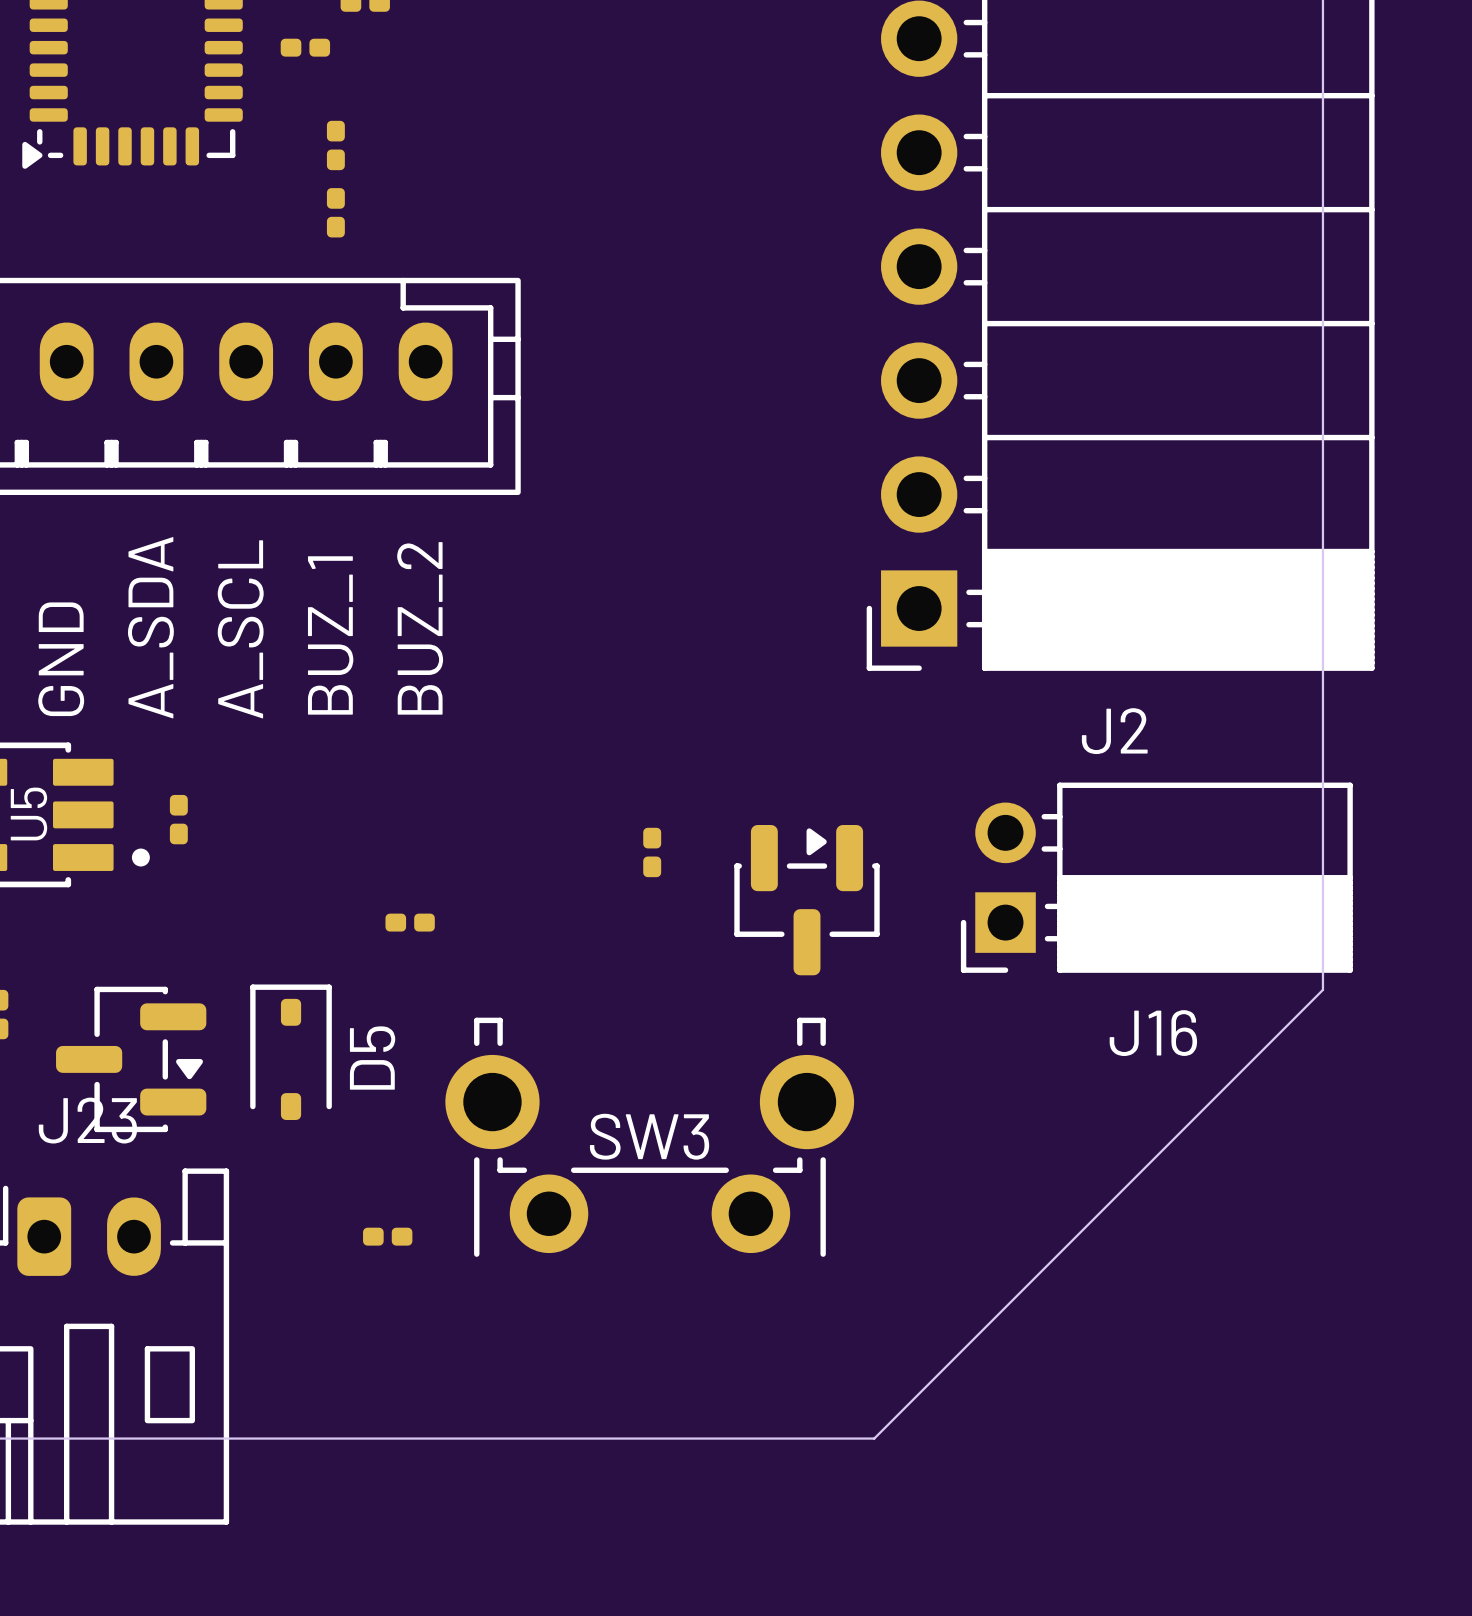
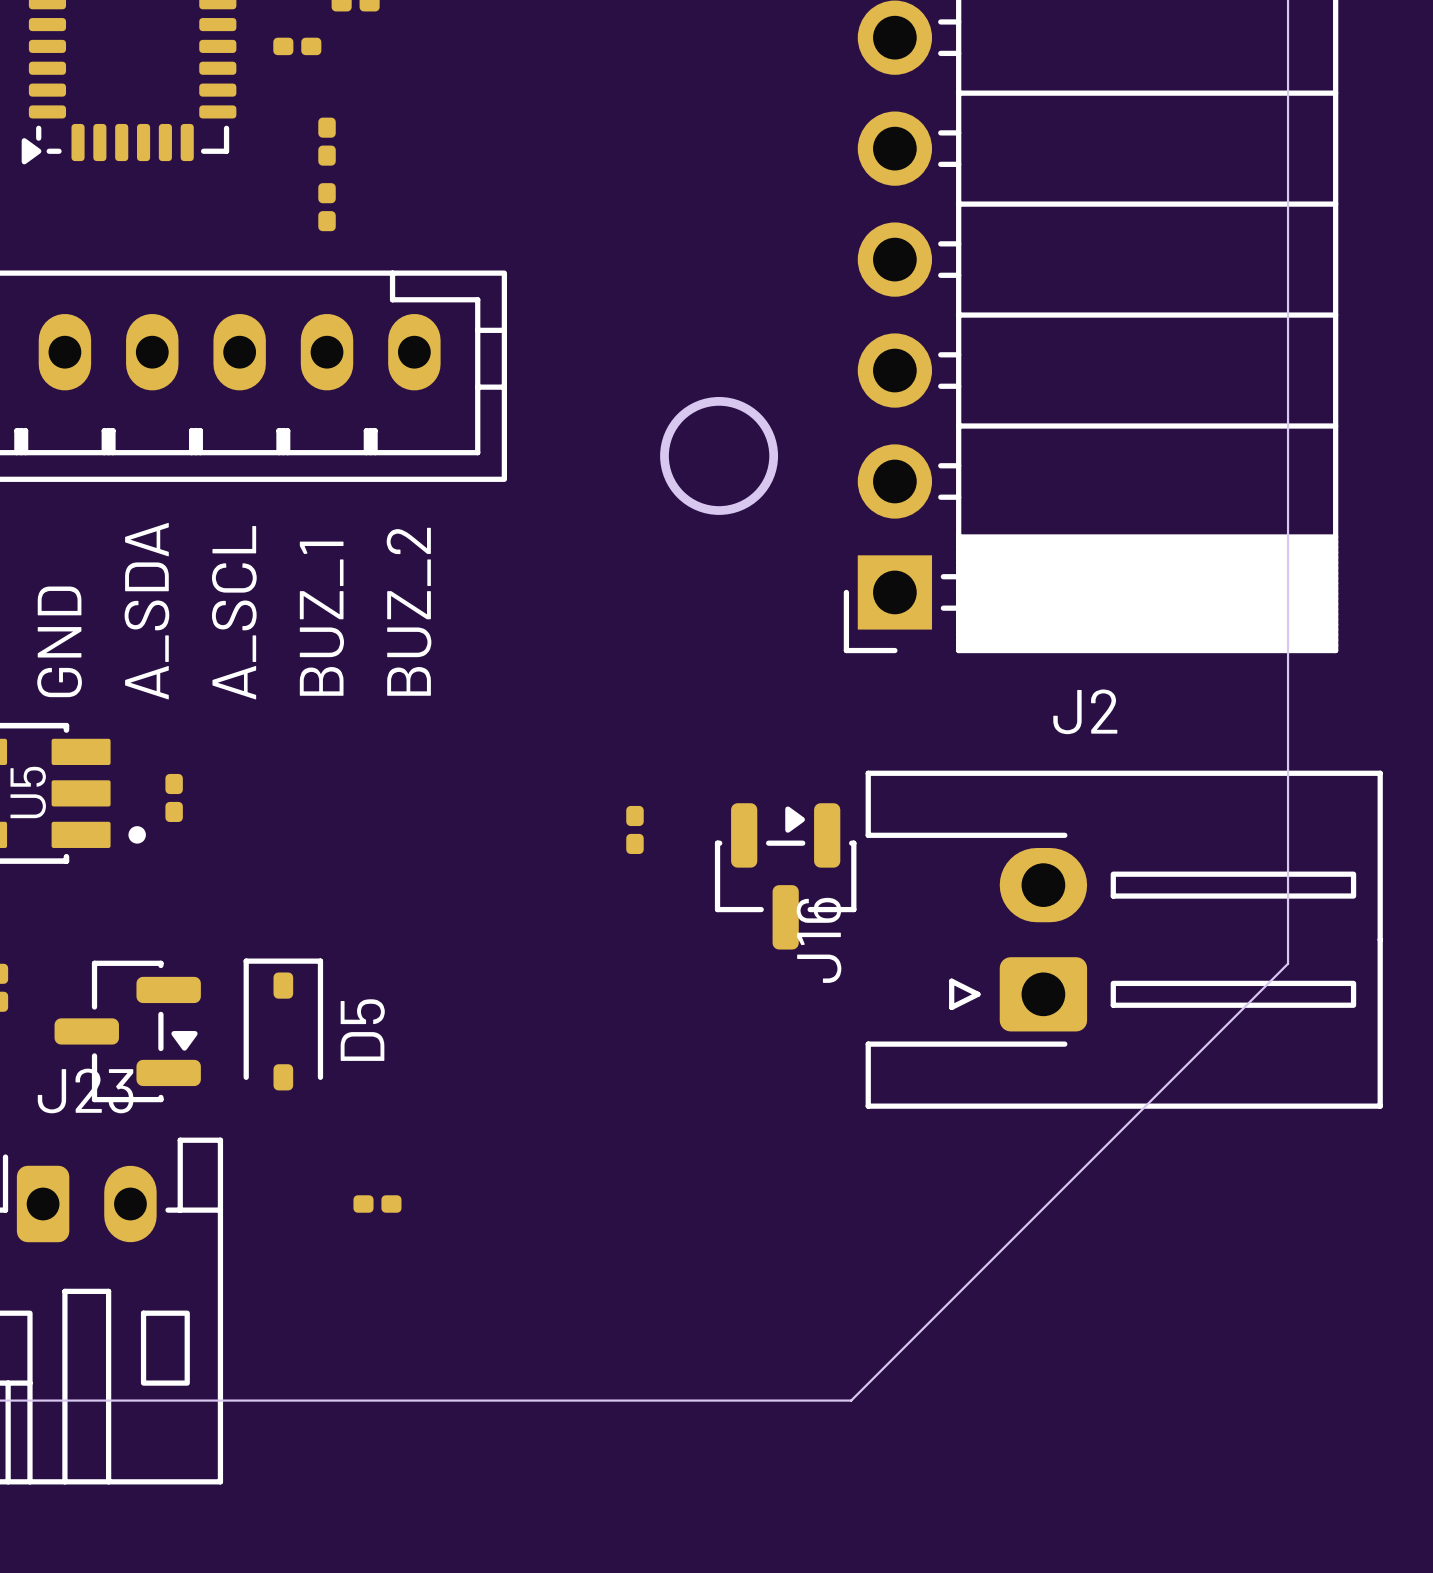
round board edge: none -> [660, 396, 779, 515]
J16 footprint: [960, 782, 1353, 973] -> [865, 770, 1383, 1109]
part: (410, 922) -> none
J16 name position: J16 (1153, 1033) -> J16 (819, 940)
SW3: (649, 1137) -> none

